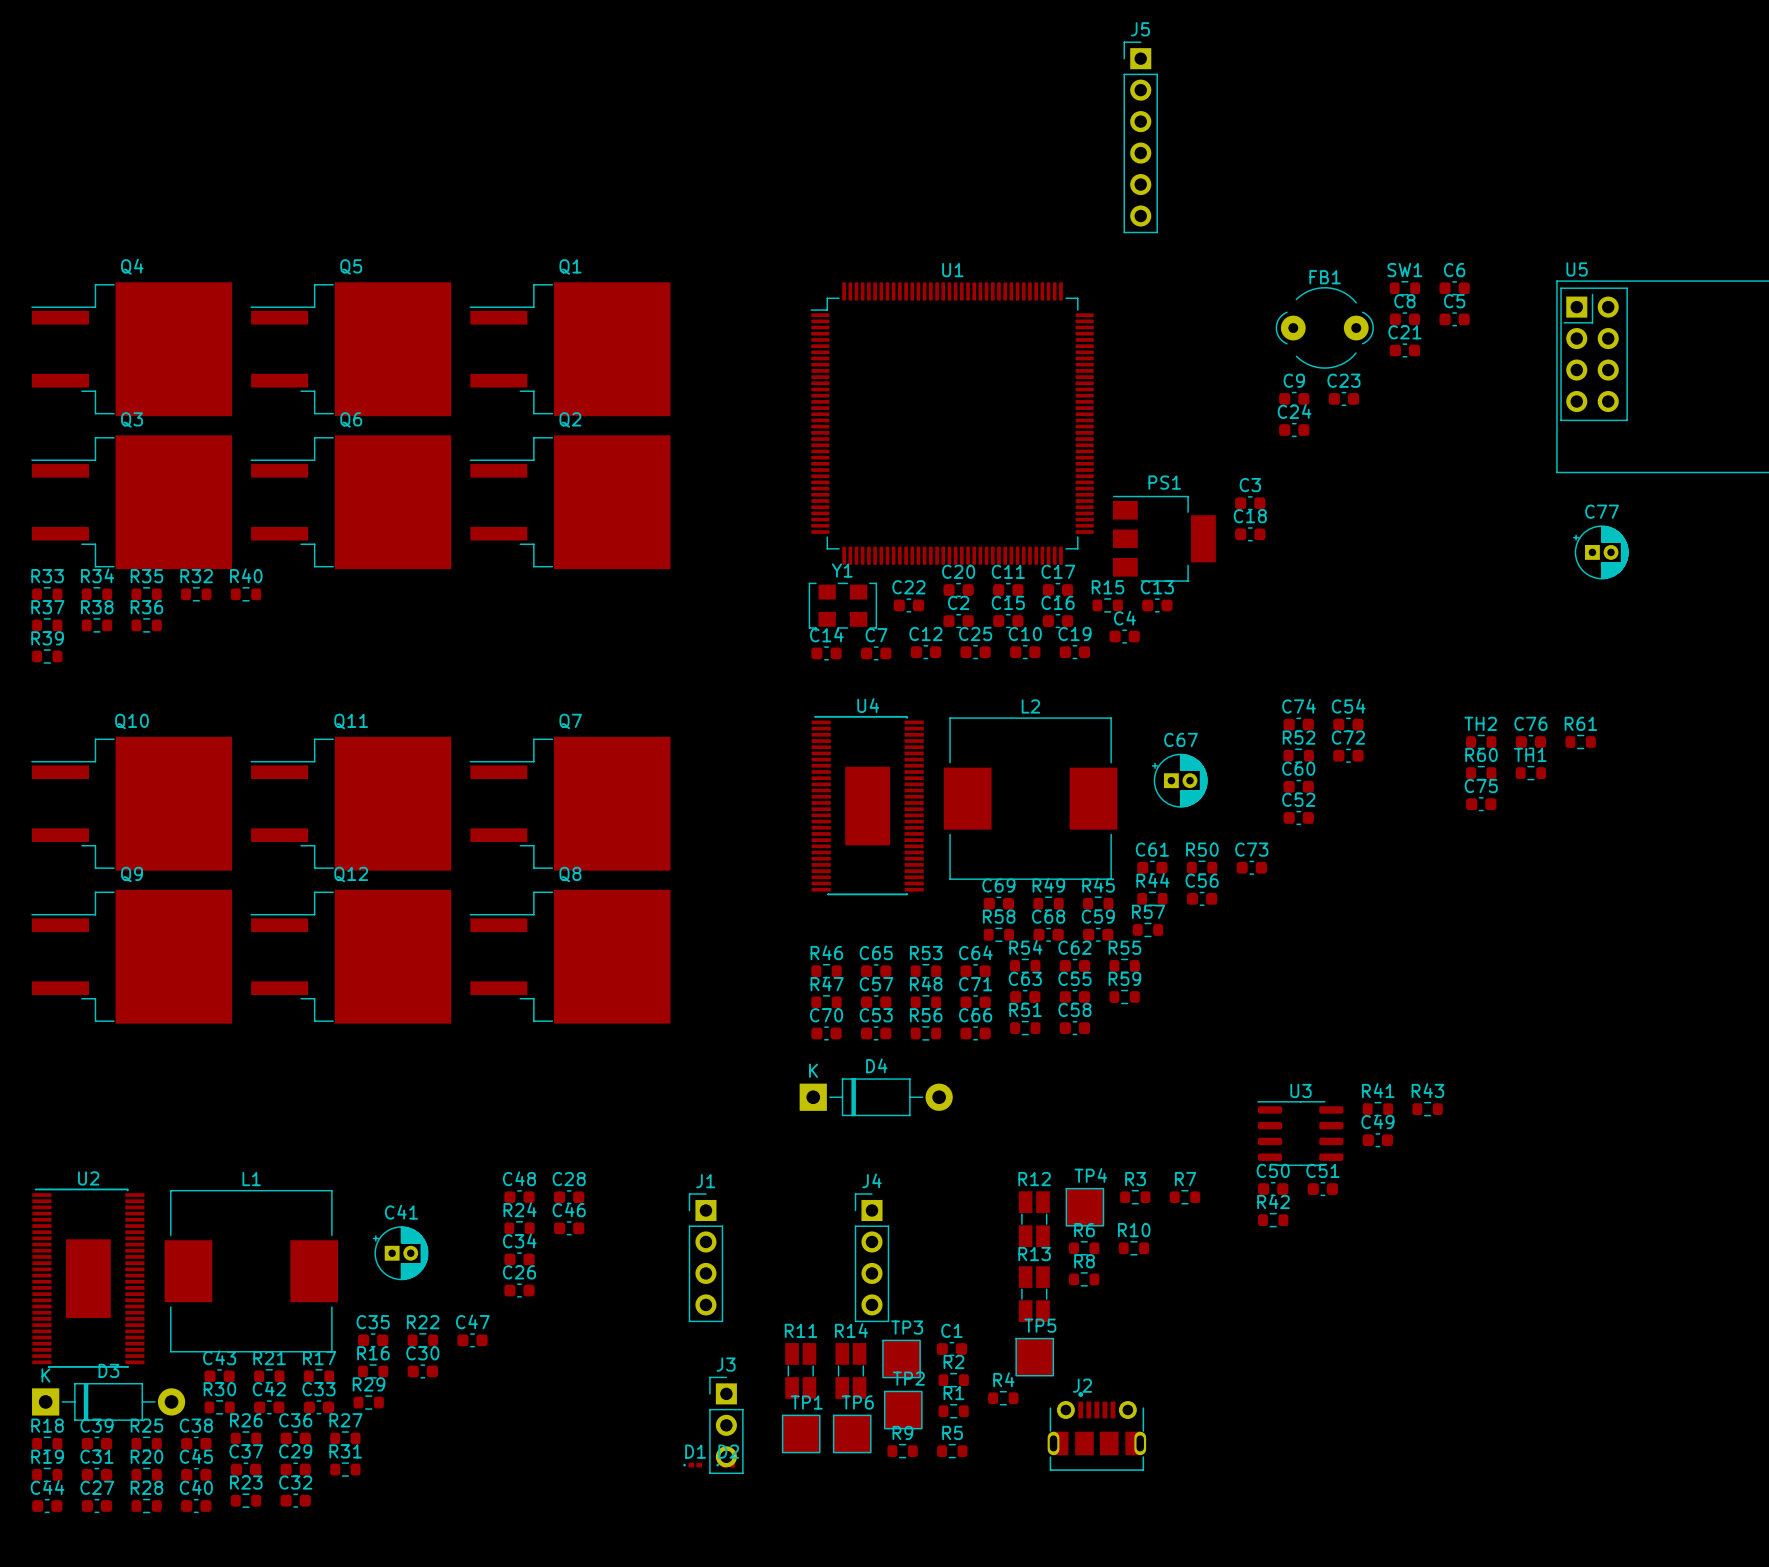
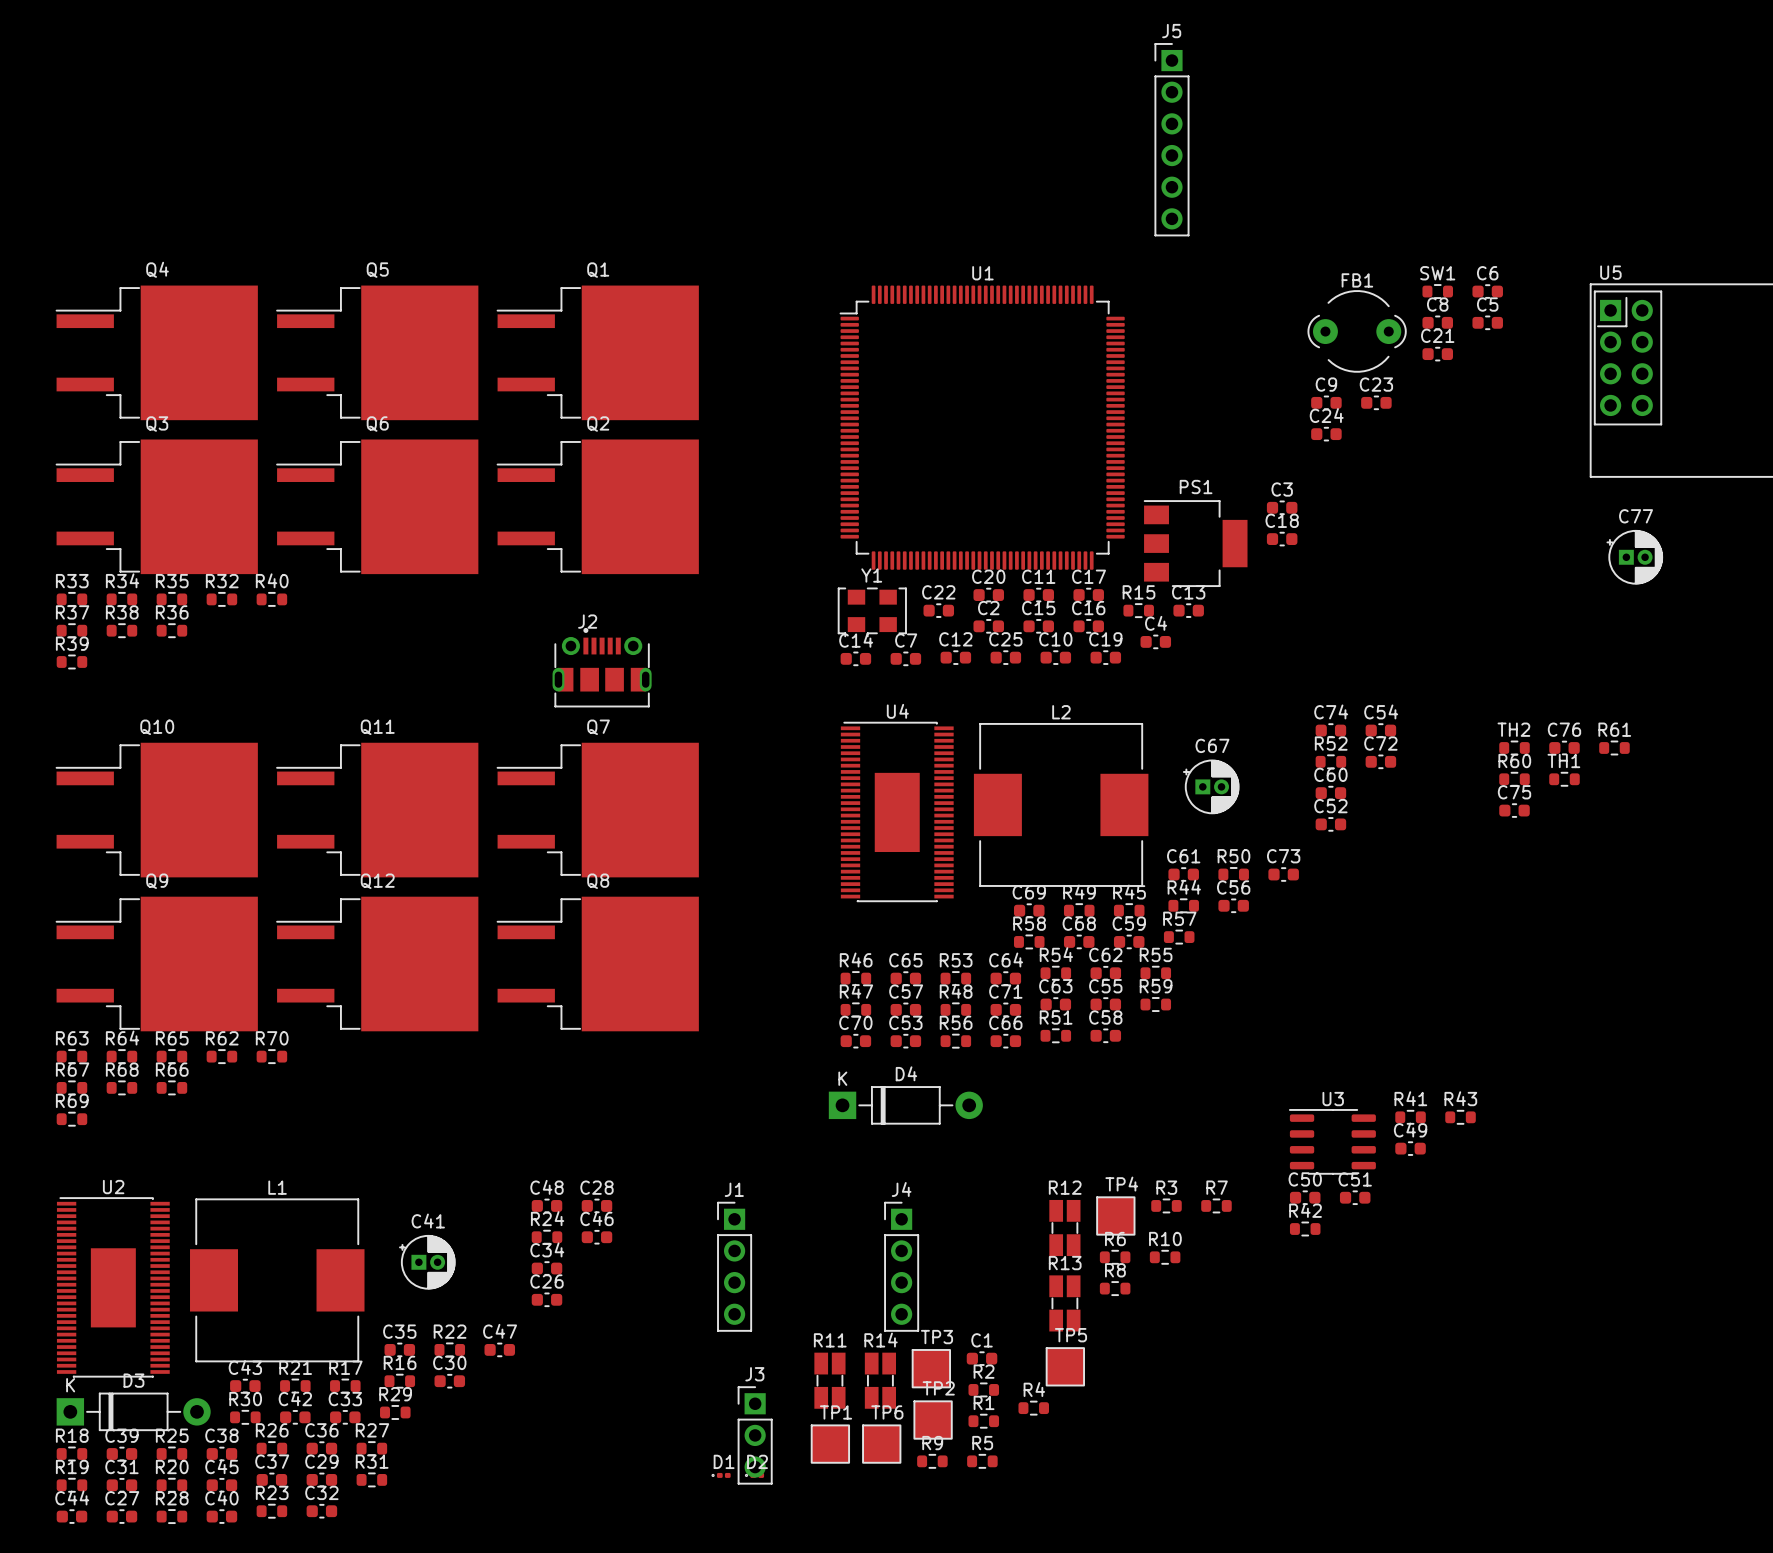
R63: none -> (71, 1056)
R64: none -> (121, 1056)
R65: none -> (171, 1056)
R62: none -> (221, 1056)
R70: none -> (271, 1056)
R67: none -> (71, 1087)
R68: none -> (121, 1087)
R66: none -> (171, 1087)
R69: none -> (71, 1119)
J2 position: (1096, 1431) -> (602, 667)

